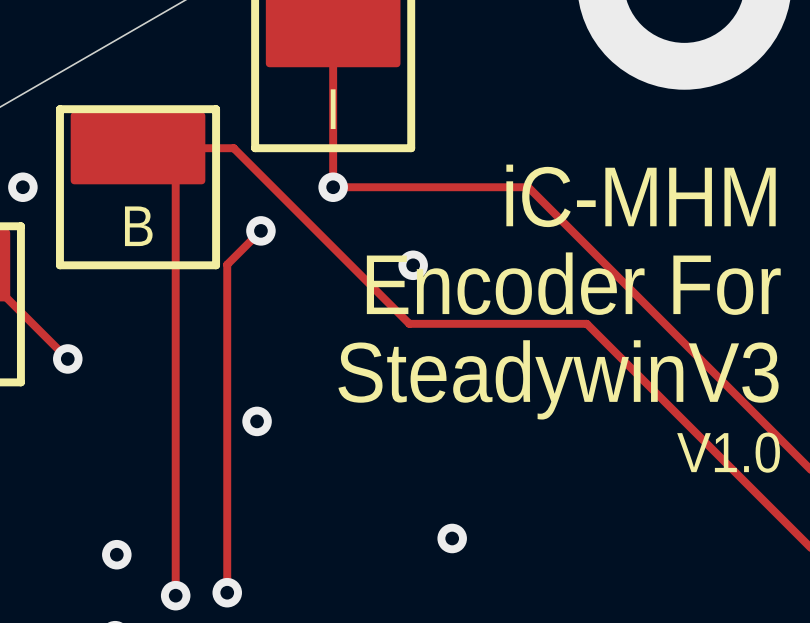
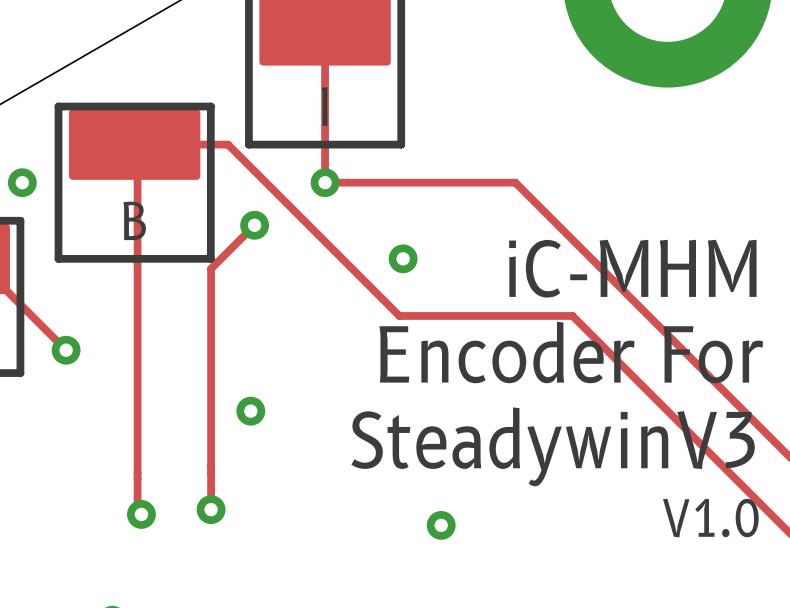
track: none -> (134, 144) (137, 147) (137, 510) (141, 514)
track: (177, 148) (175, 150) (175, 595) -> none
text position: iC-MHM (641, 195) -> iC-MHM (632, 268)
track: (227, 264) (227, 592) -> (221, 258) (211, 268) (211, 509)
text position: Encoder For (573, 283) -> Encoder For (571, 352)
text: SteadywinV3 (558, 379) -> none
text: V1.0 (728, 452) -> SteadywinV3 (553, 446)
via: none -> (211, 509)
via: none -> (141, 514)
text: none -> V1.0 (710, 518)
via: (116, 554) -> none
via: (227, 592) -> none
via: (175, 595) -> none

